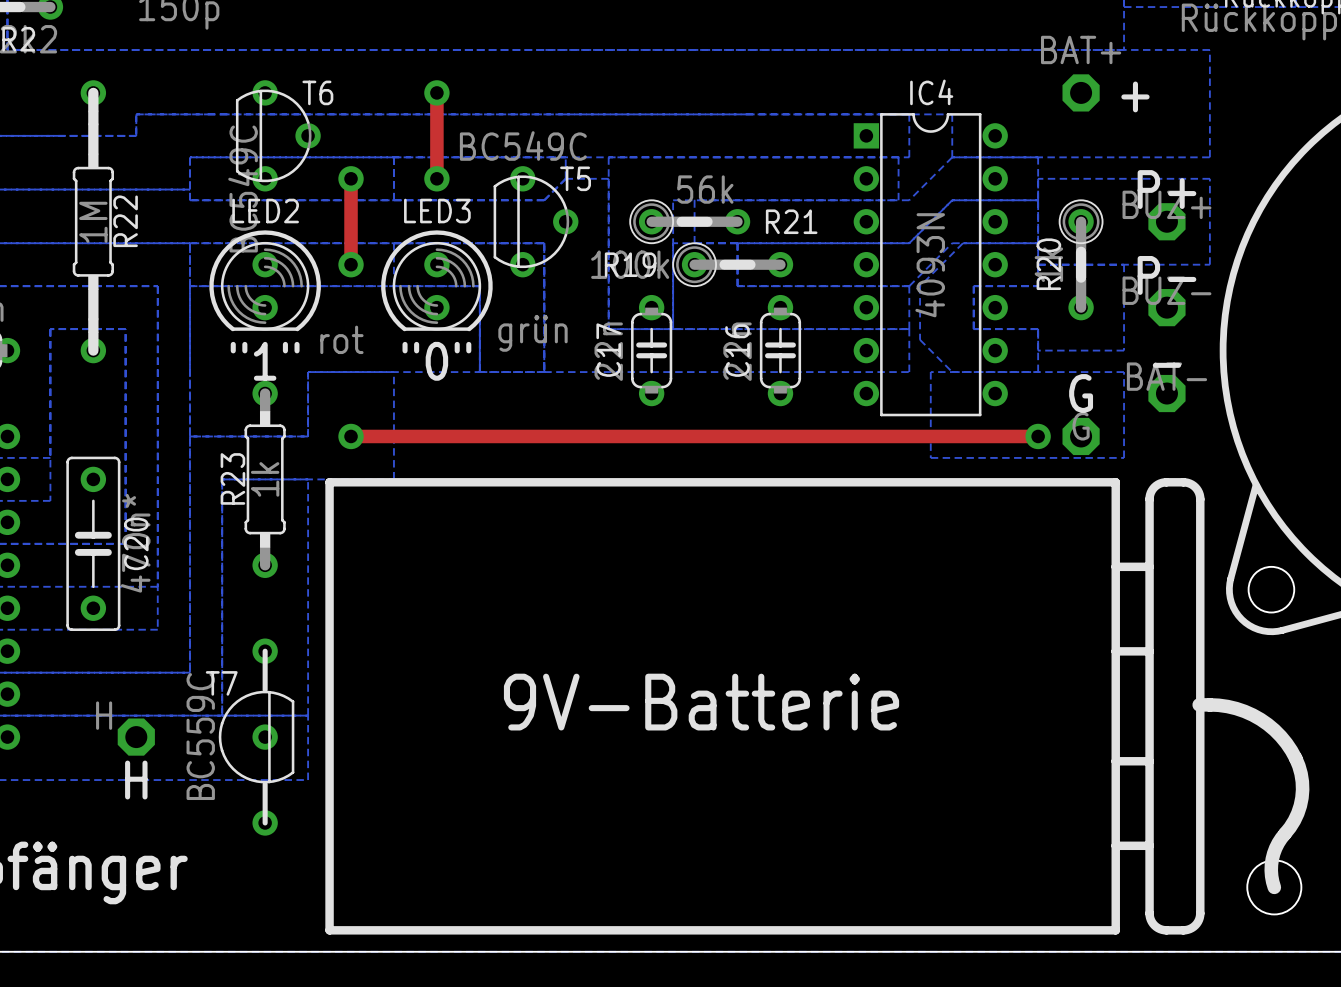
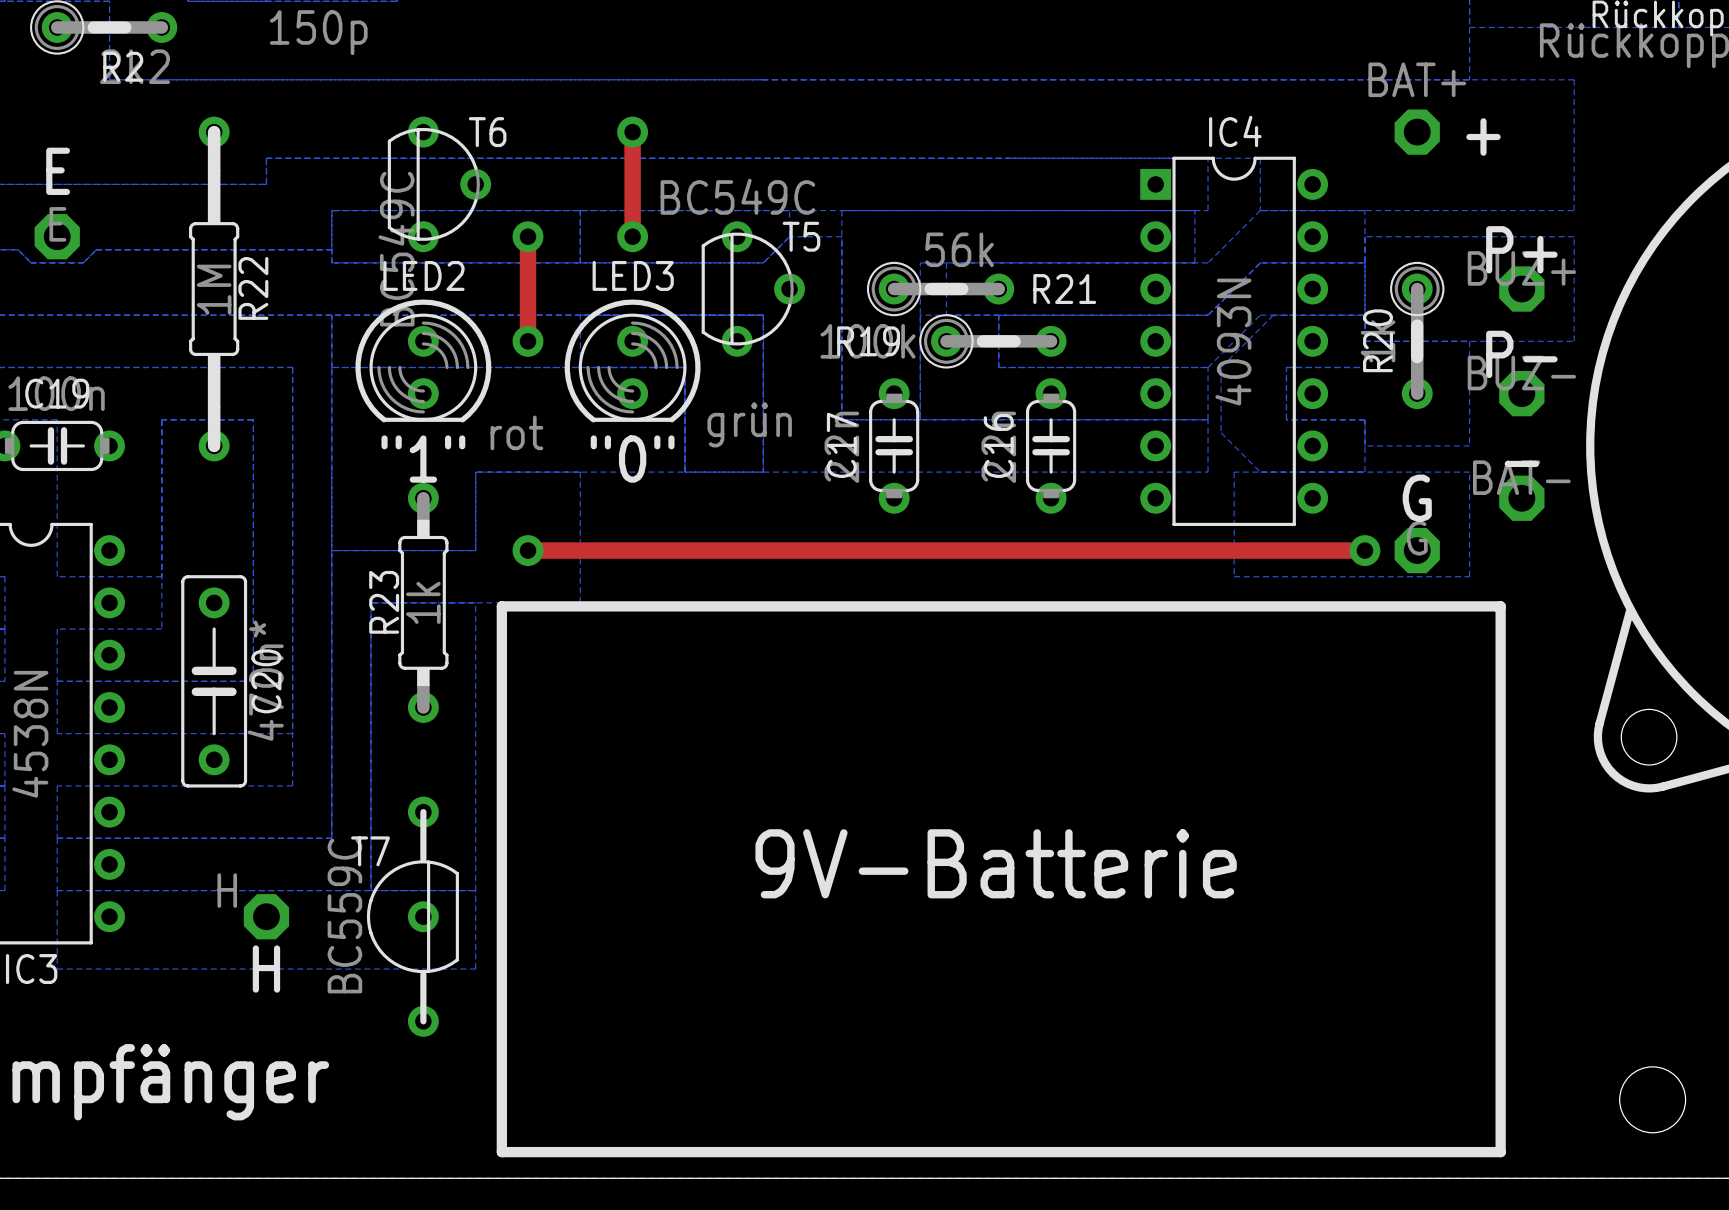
drawing: [325, 478, 1205, 935] -> none
drawing: none -> [496, 601, 1506, 1158]
line: (1199, 704) (1227, 706) (1244, 711) (1260, 719) (1280, 736) (1291, 750) (1298, 765) (1302, 781) (1301, 797) (1294, 820) (1278, 842) (1273, 853) (1271, 870) (1274, 887) -> none

